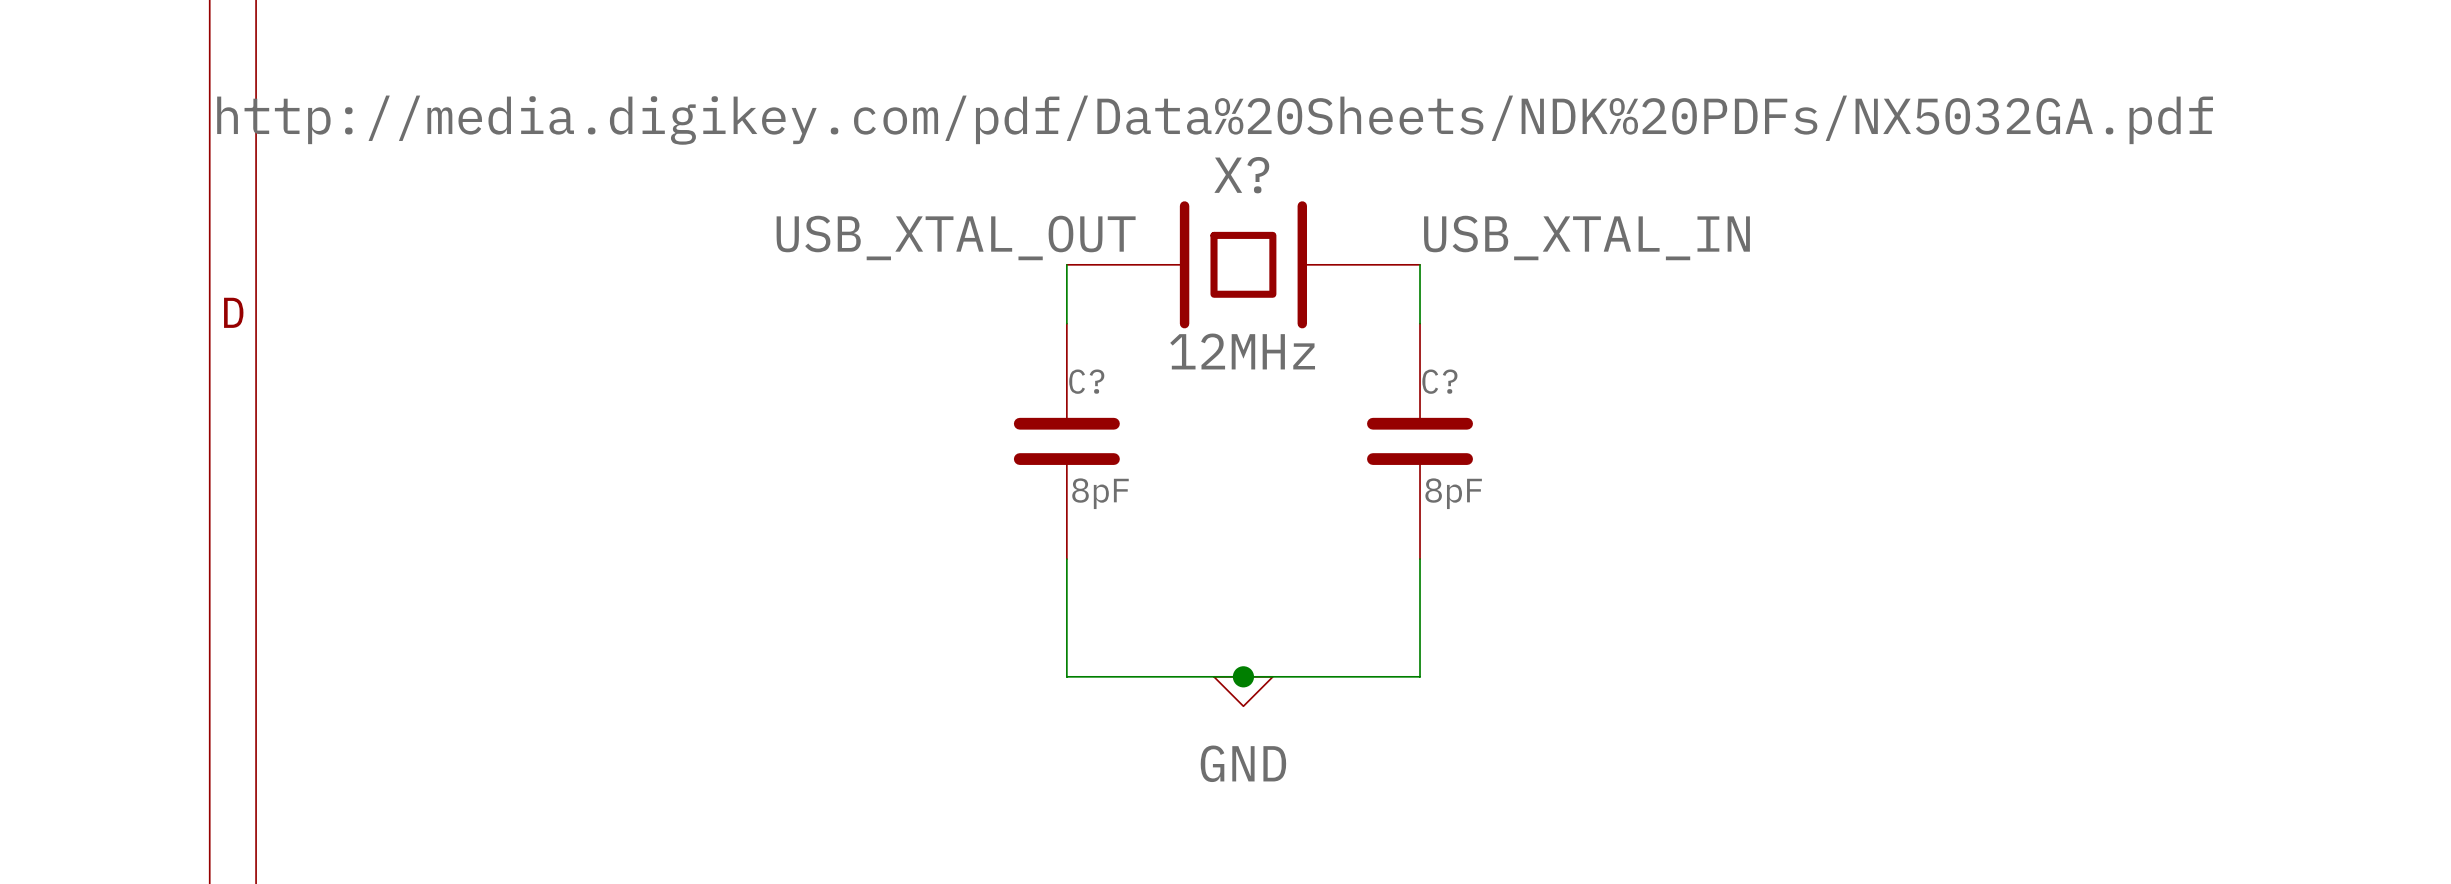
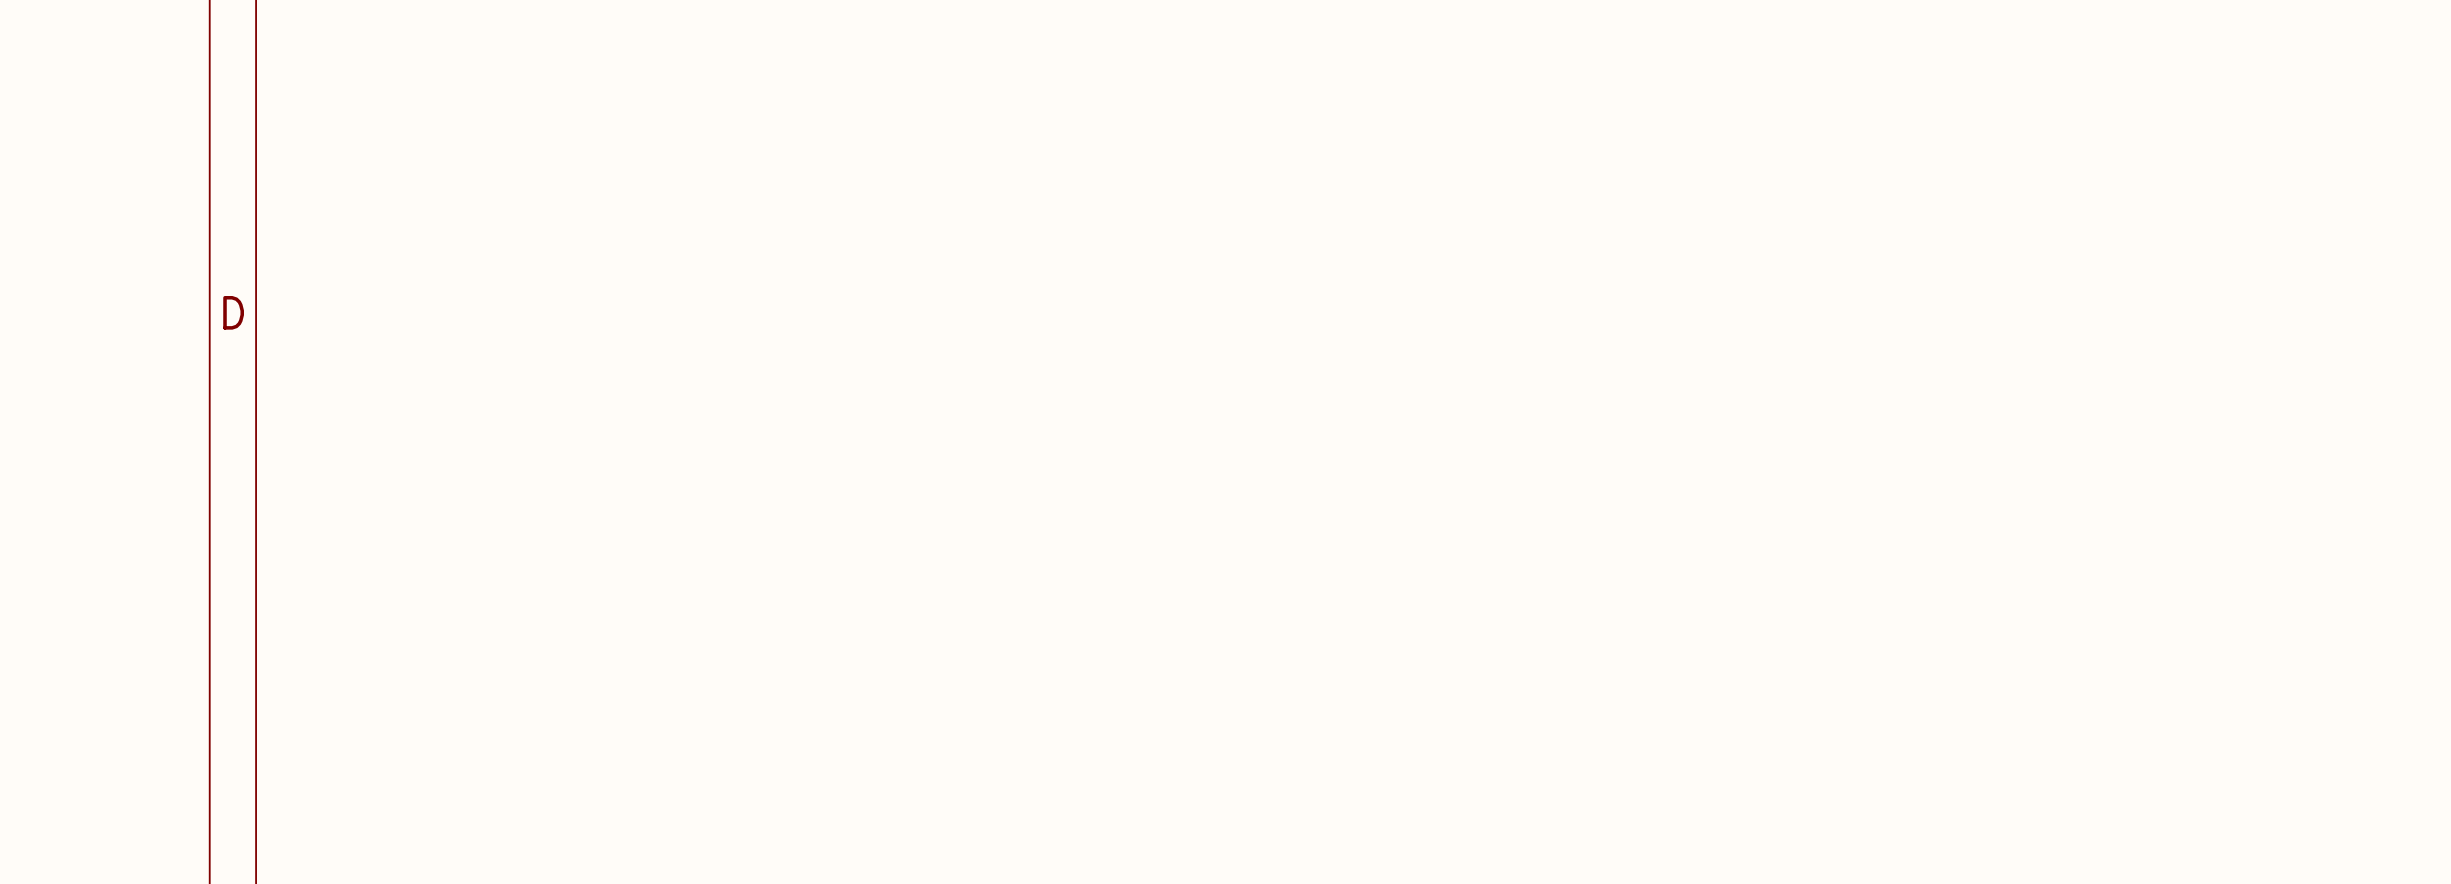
label: USB_XTAL_OUT (956, 237) -> none
label: USB_XTAL_IN (1586, 237) -> none
wire: (1066, 264) (1066, 323) -> none
X?: 12MHz (1243, 264) -> none
wire: (1420, 264) (1420, 323) -> none
C?: 8pF (1066, 441) -> none
C?: 8pF (1420, 441) -> none
wire: (1066, 559) (1066, 676) (1420, 676) (1420, 559) -> none
junction: (1243, 676) -> none
power symbol: GND (1243, 691) -> none

